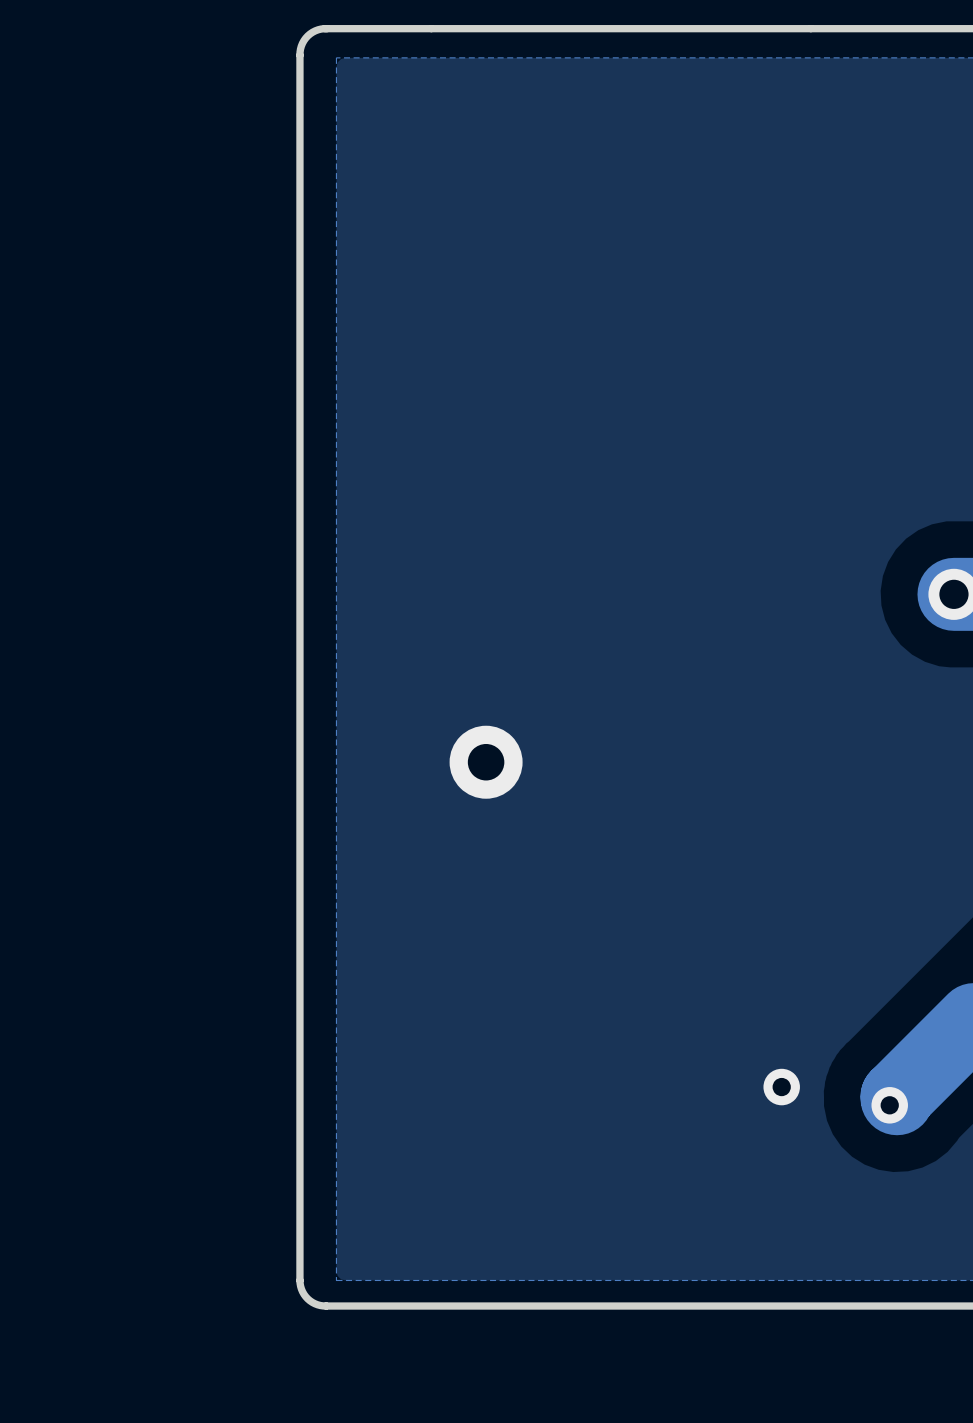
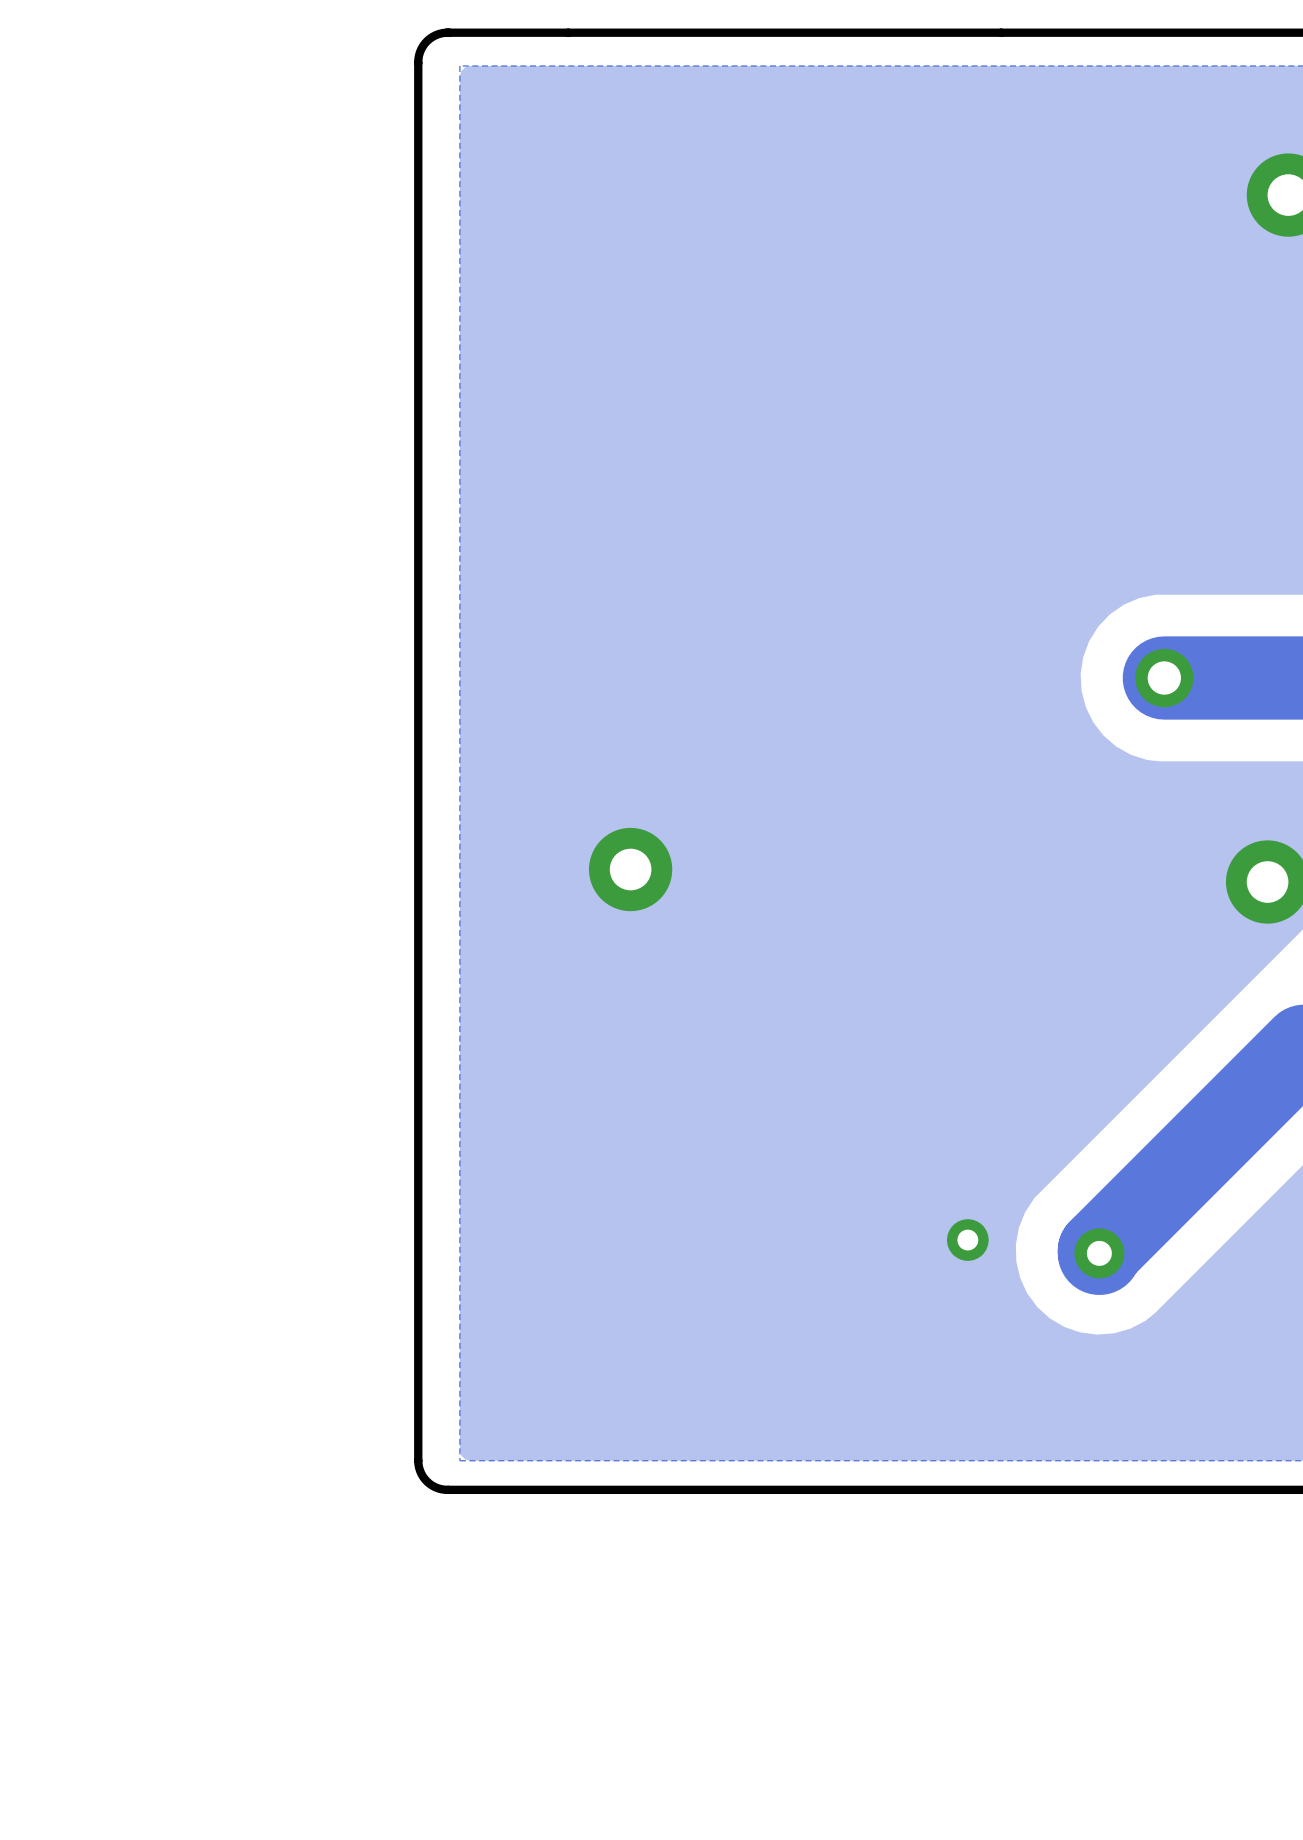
via size: [871, 1087, 908, 1124] -> [1074, 1228, 1125, 1279]

